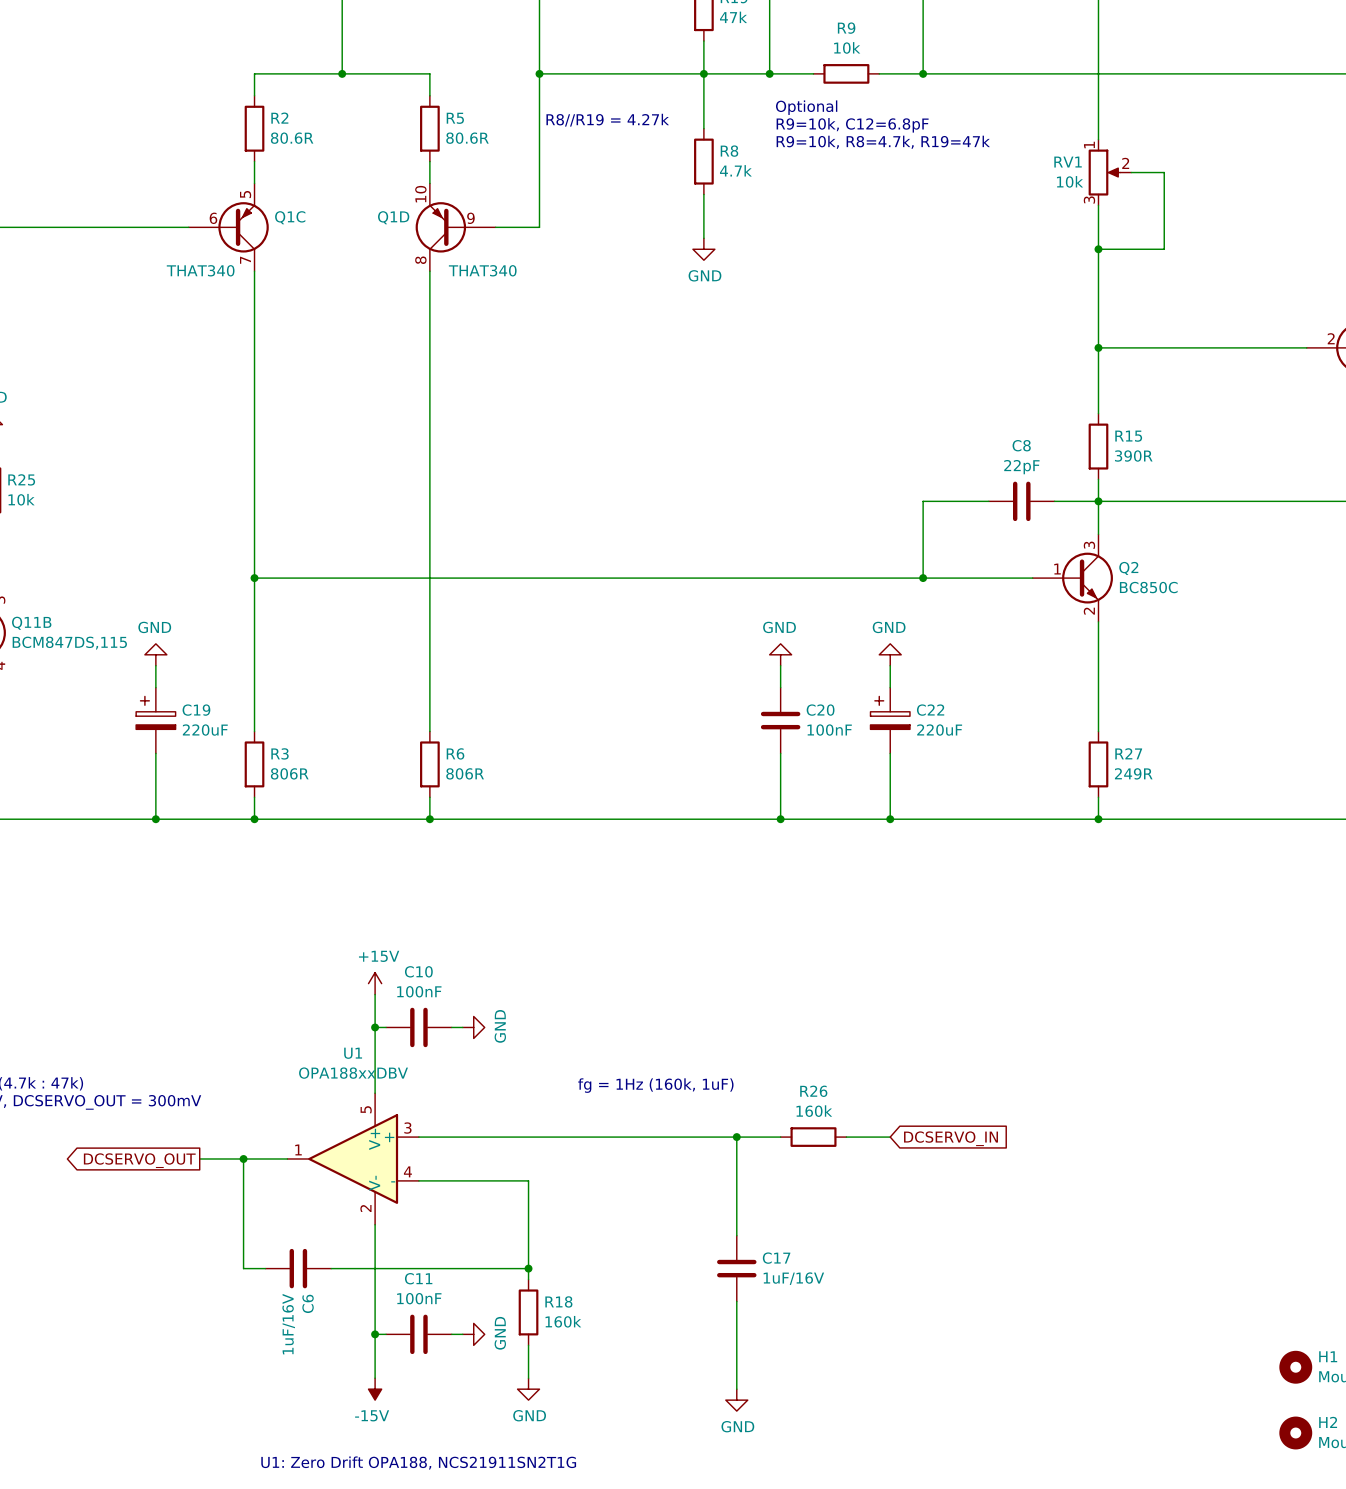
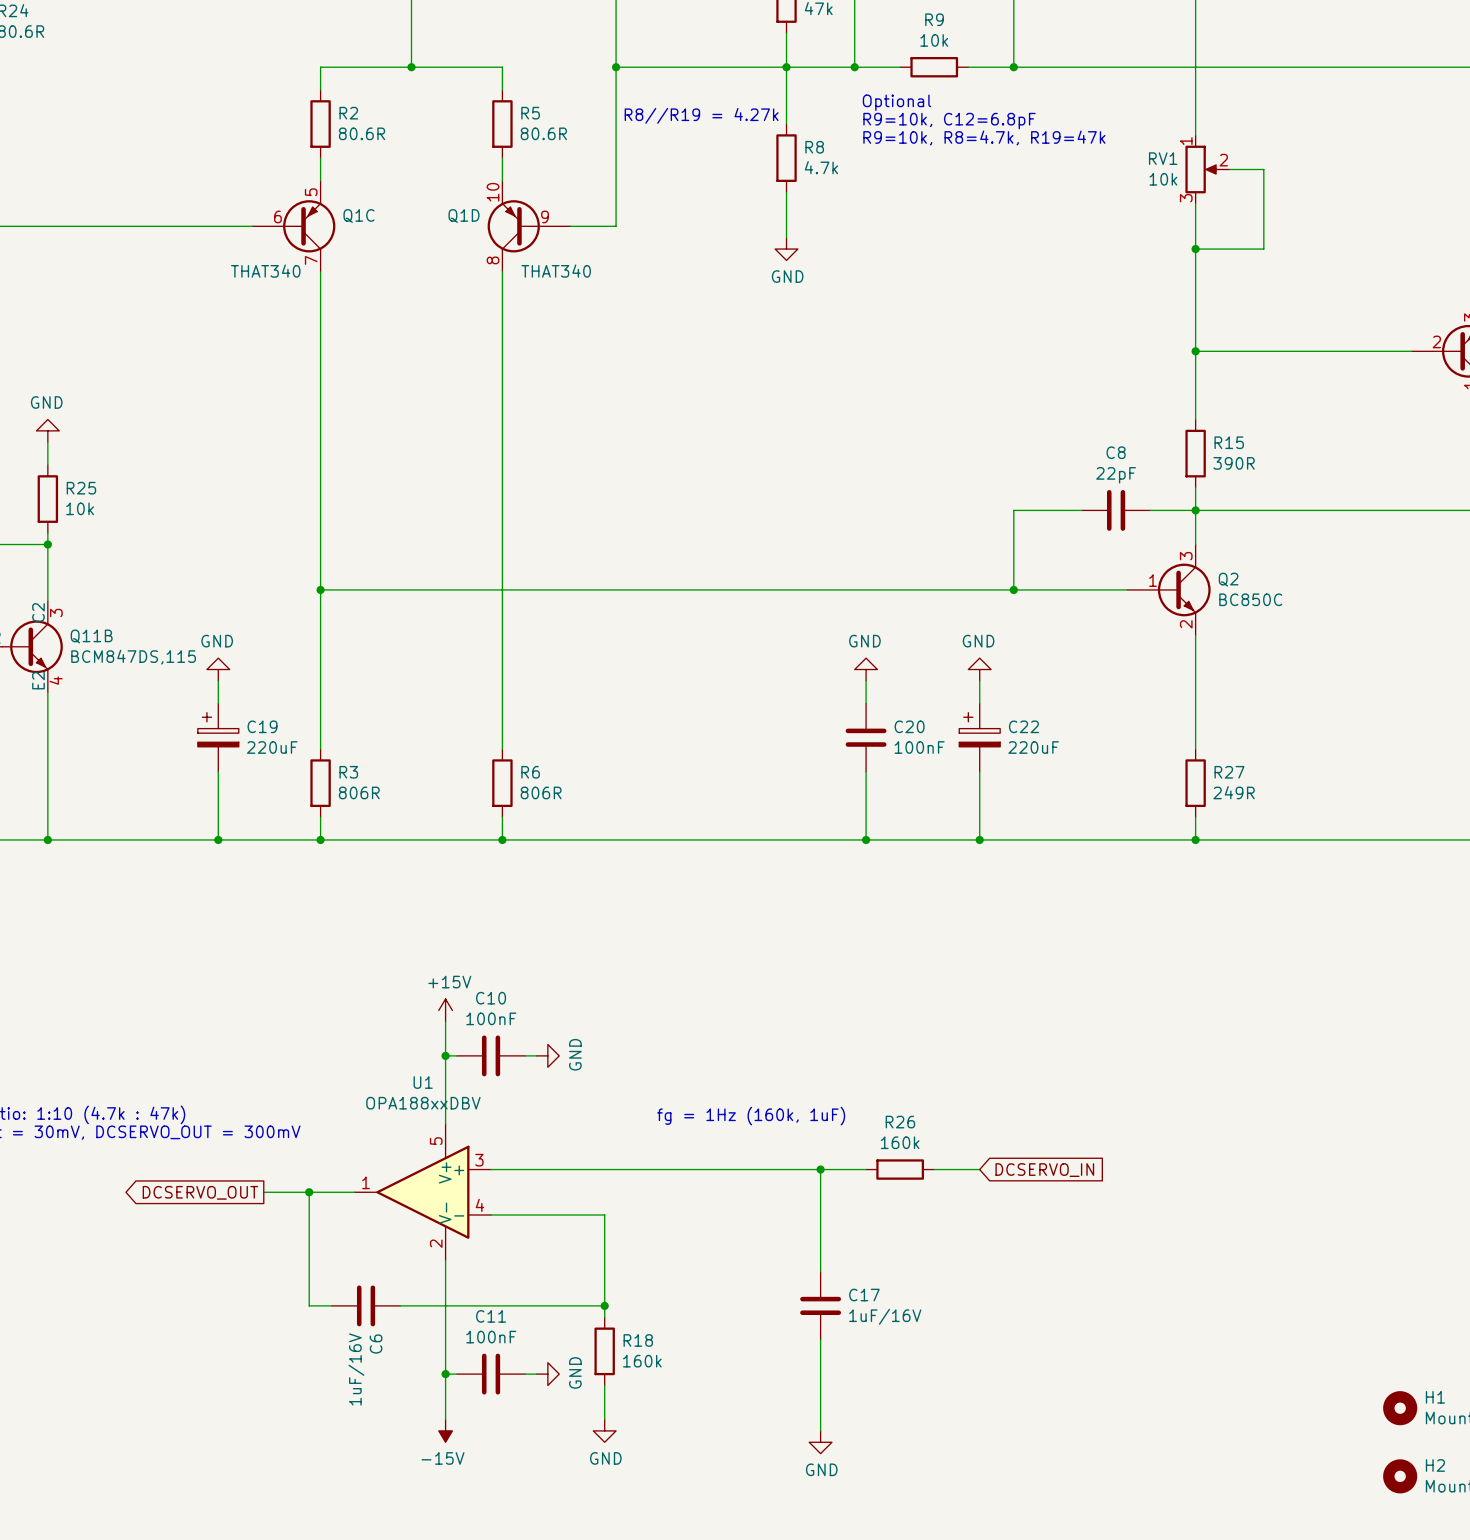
text: U1: Zero Drift OPA188, NCS21911SN2T1G (418, 1463) -> none

